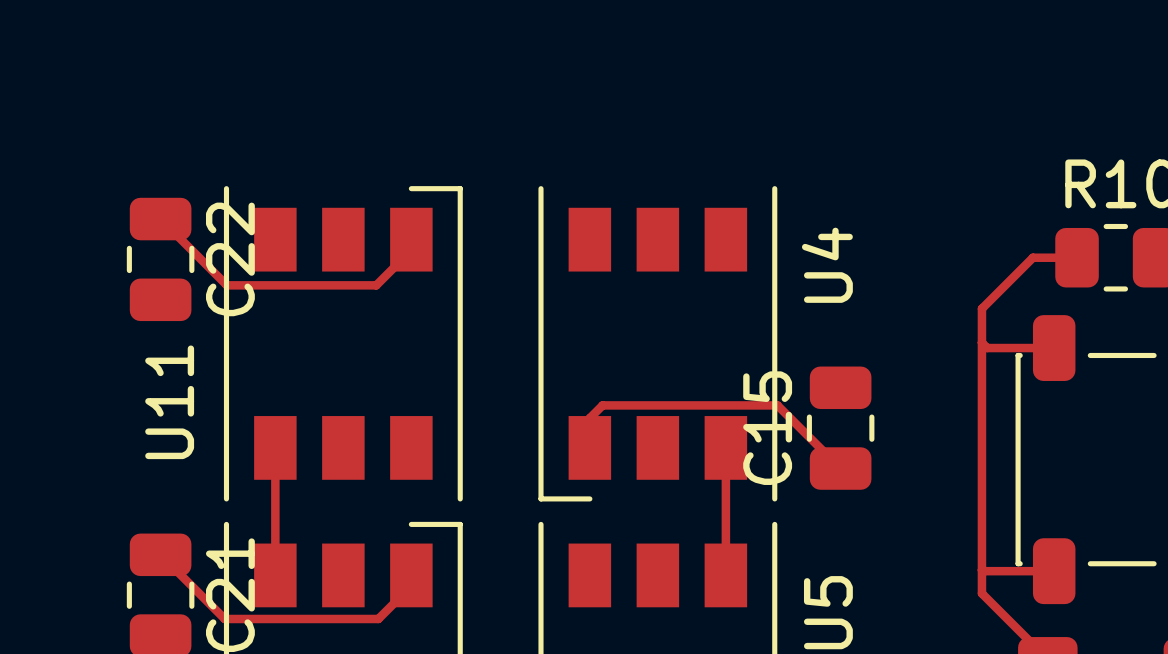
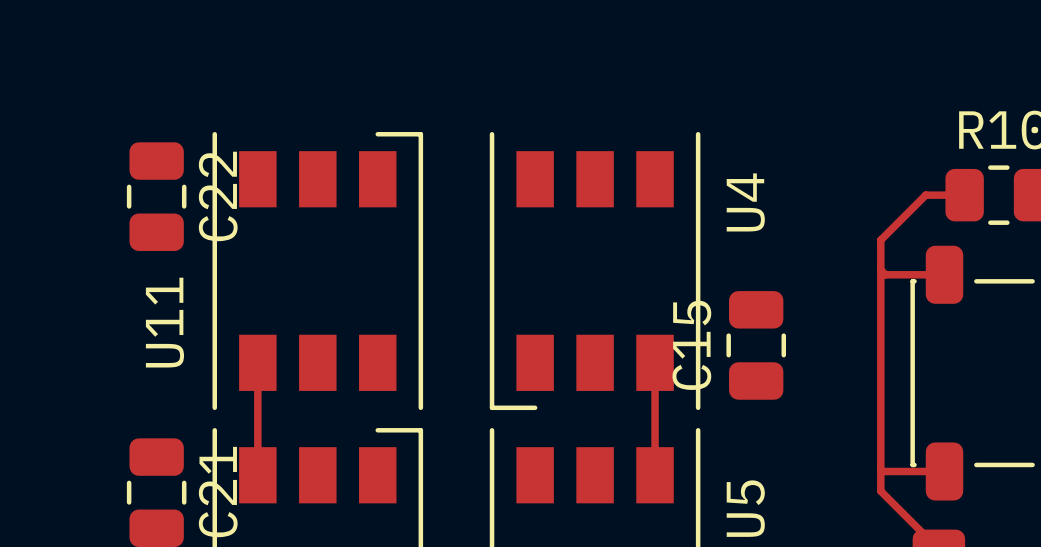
track: (160, 219) (226, 285) (376, 285) (411, 250) (411, 239) -> none
track: (589, 447) (589, 418) (602, 405) (777, 405) (840, 468) -> none
track: (160, 554) (224, 618) (378, 618) (411, 586) (411, 575) -> none

